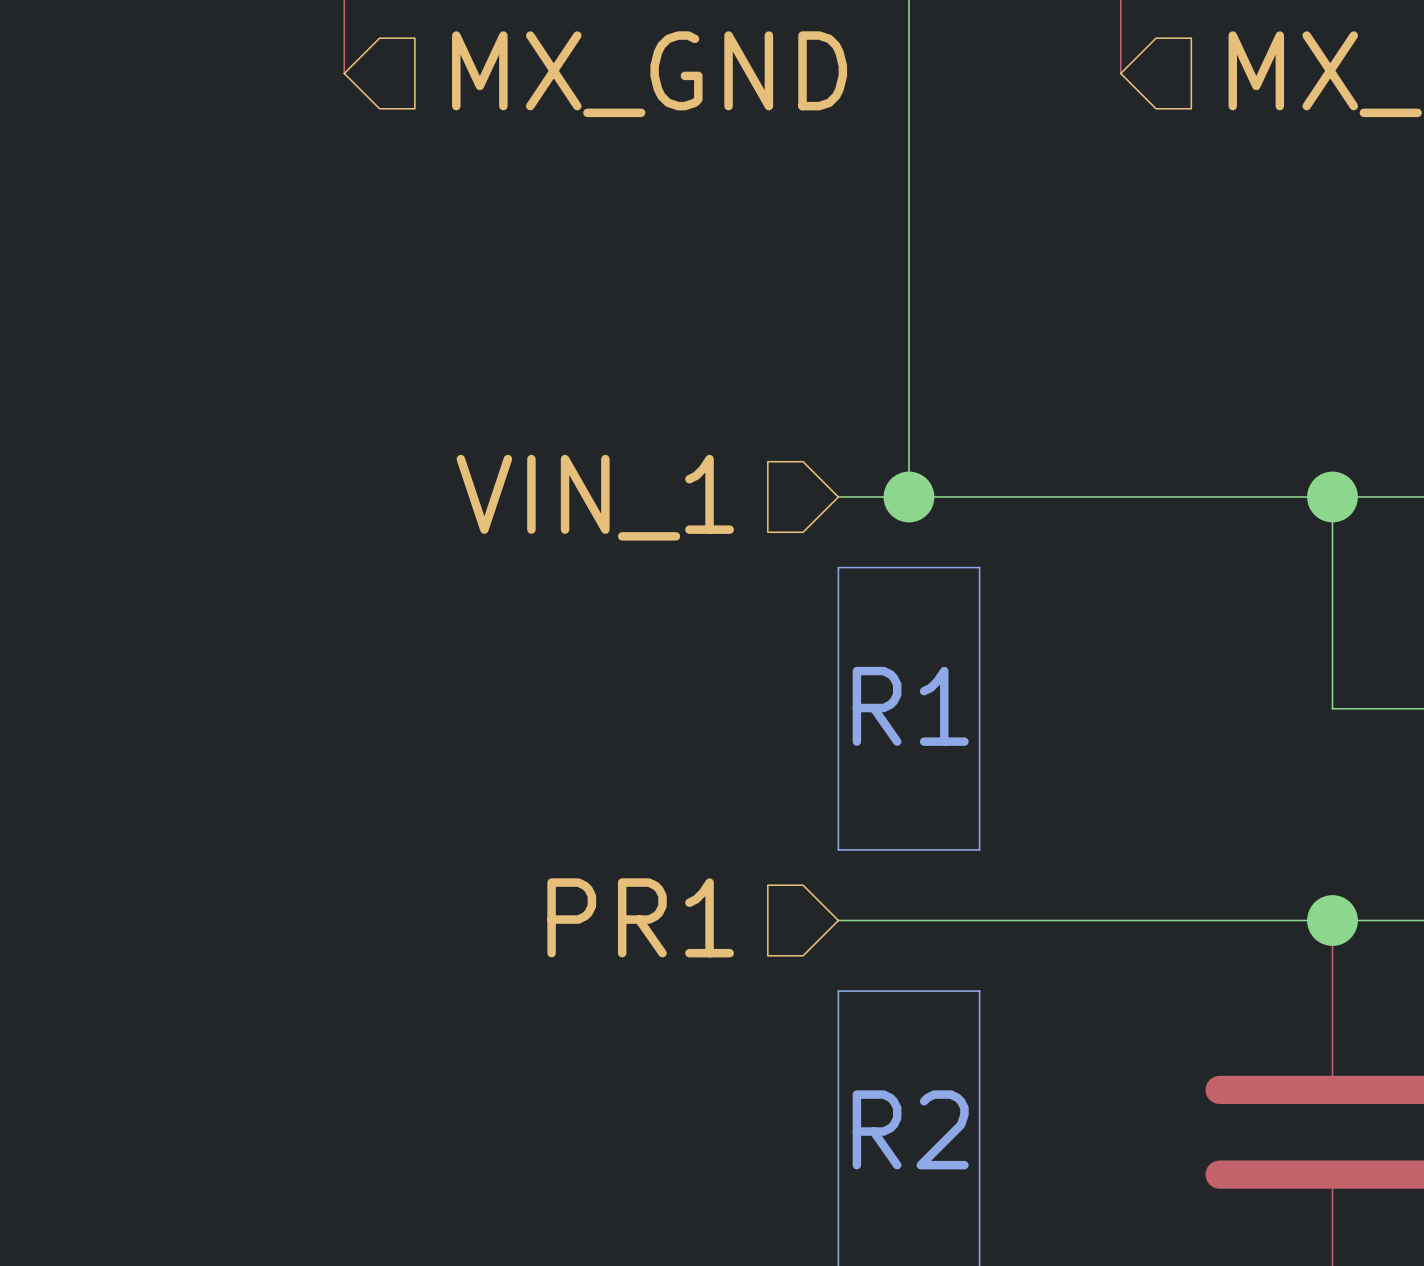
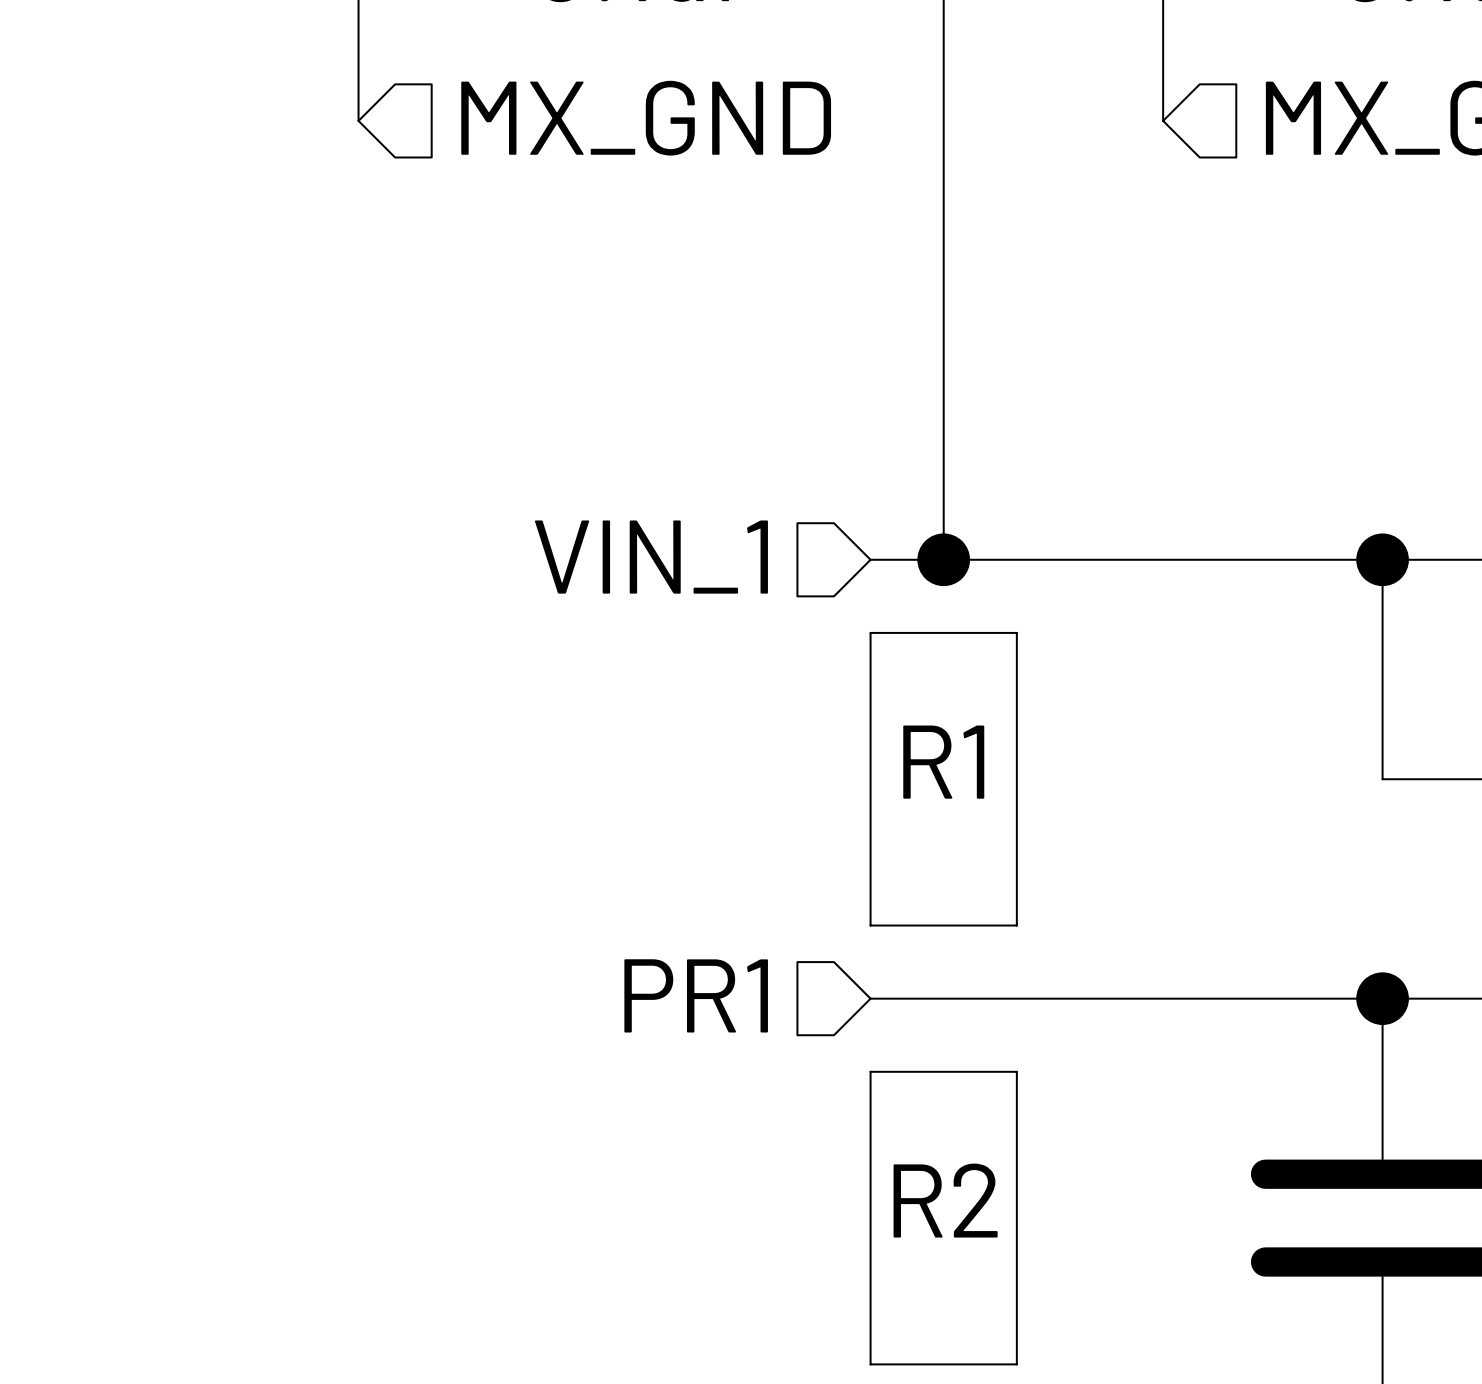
text position: R1 (910, 706) -> R1 (943, 762)
text position: R2 (910, 1129) -> R2 (945, 1200)

